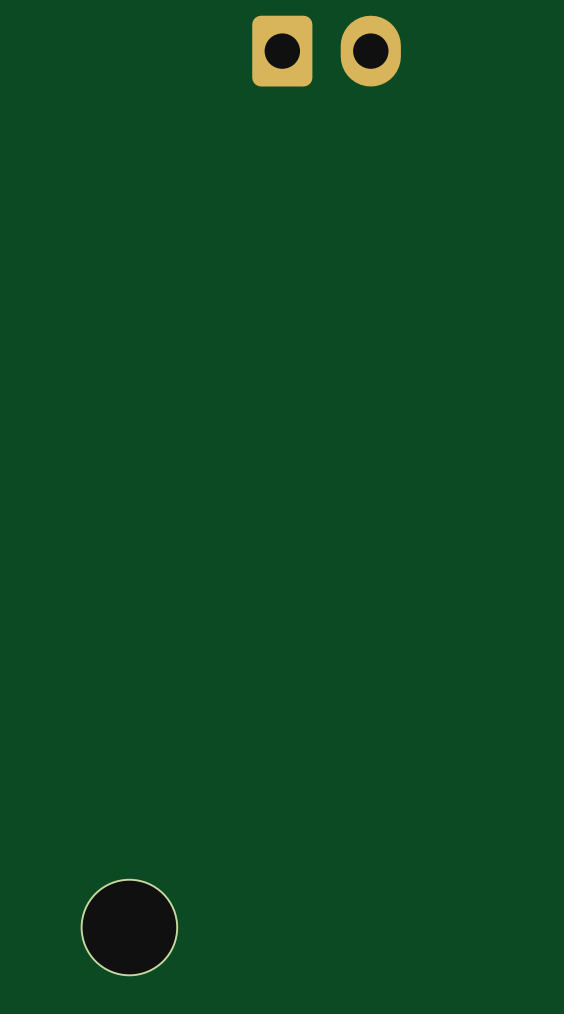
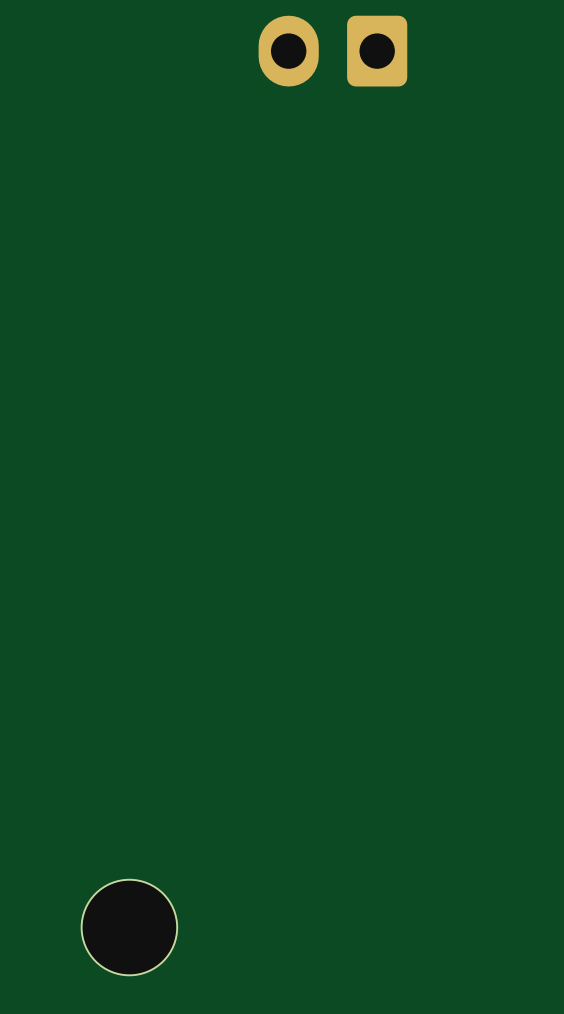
part rotation: 0° (326, 51) -> 180° (332, 51)

